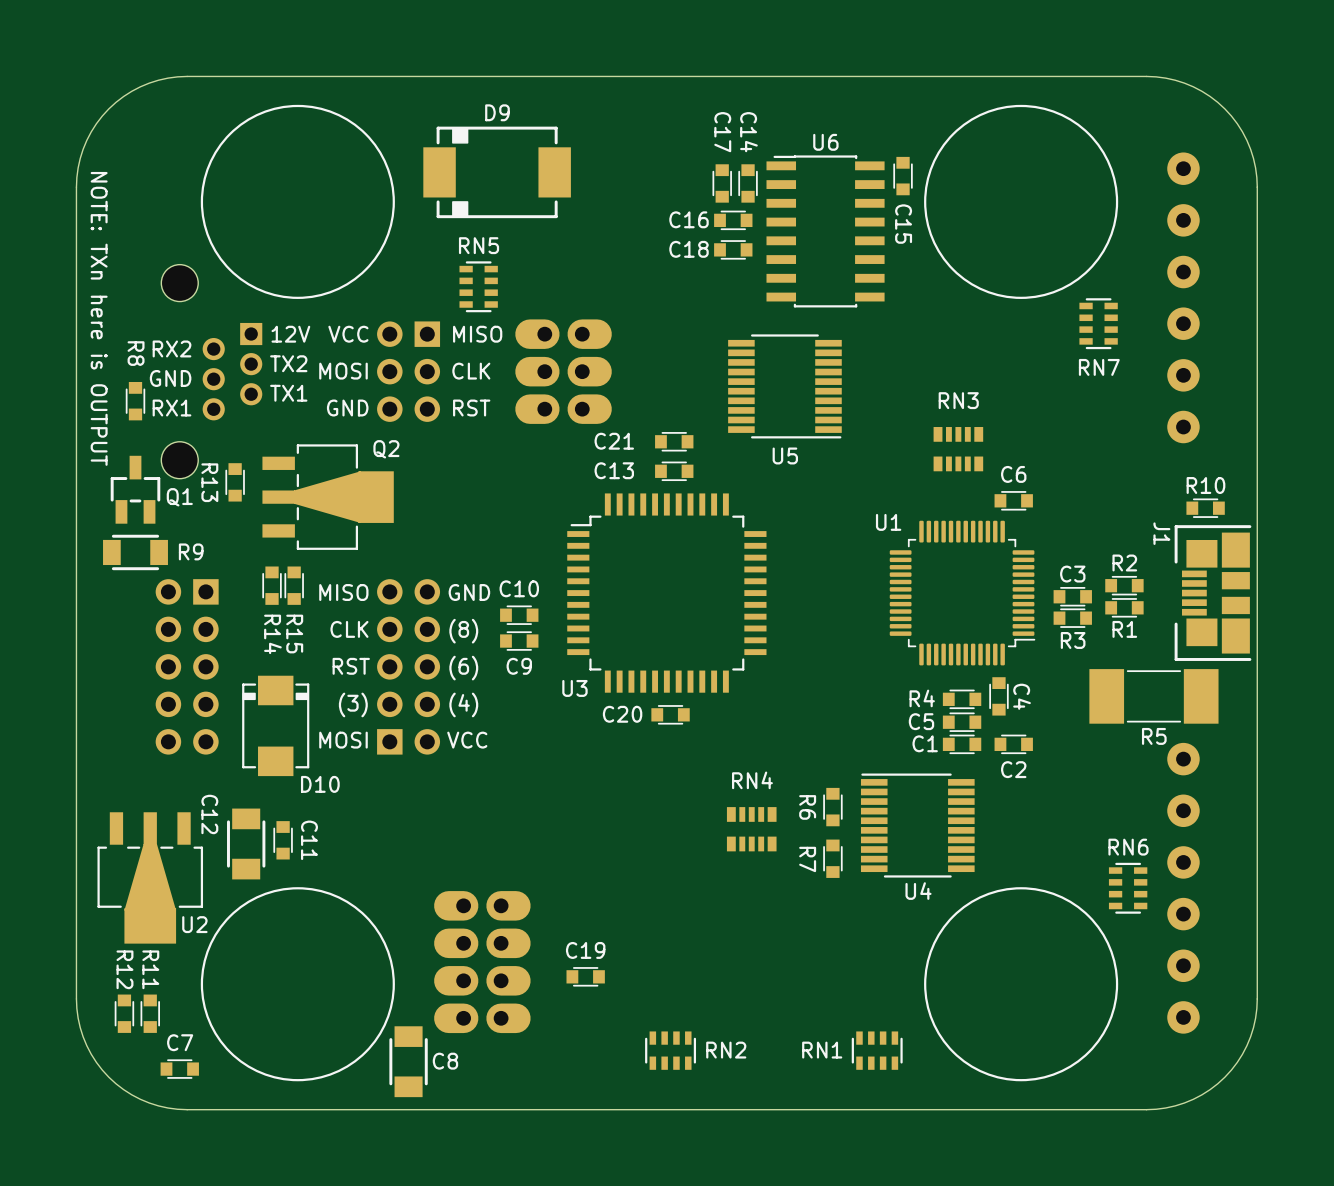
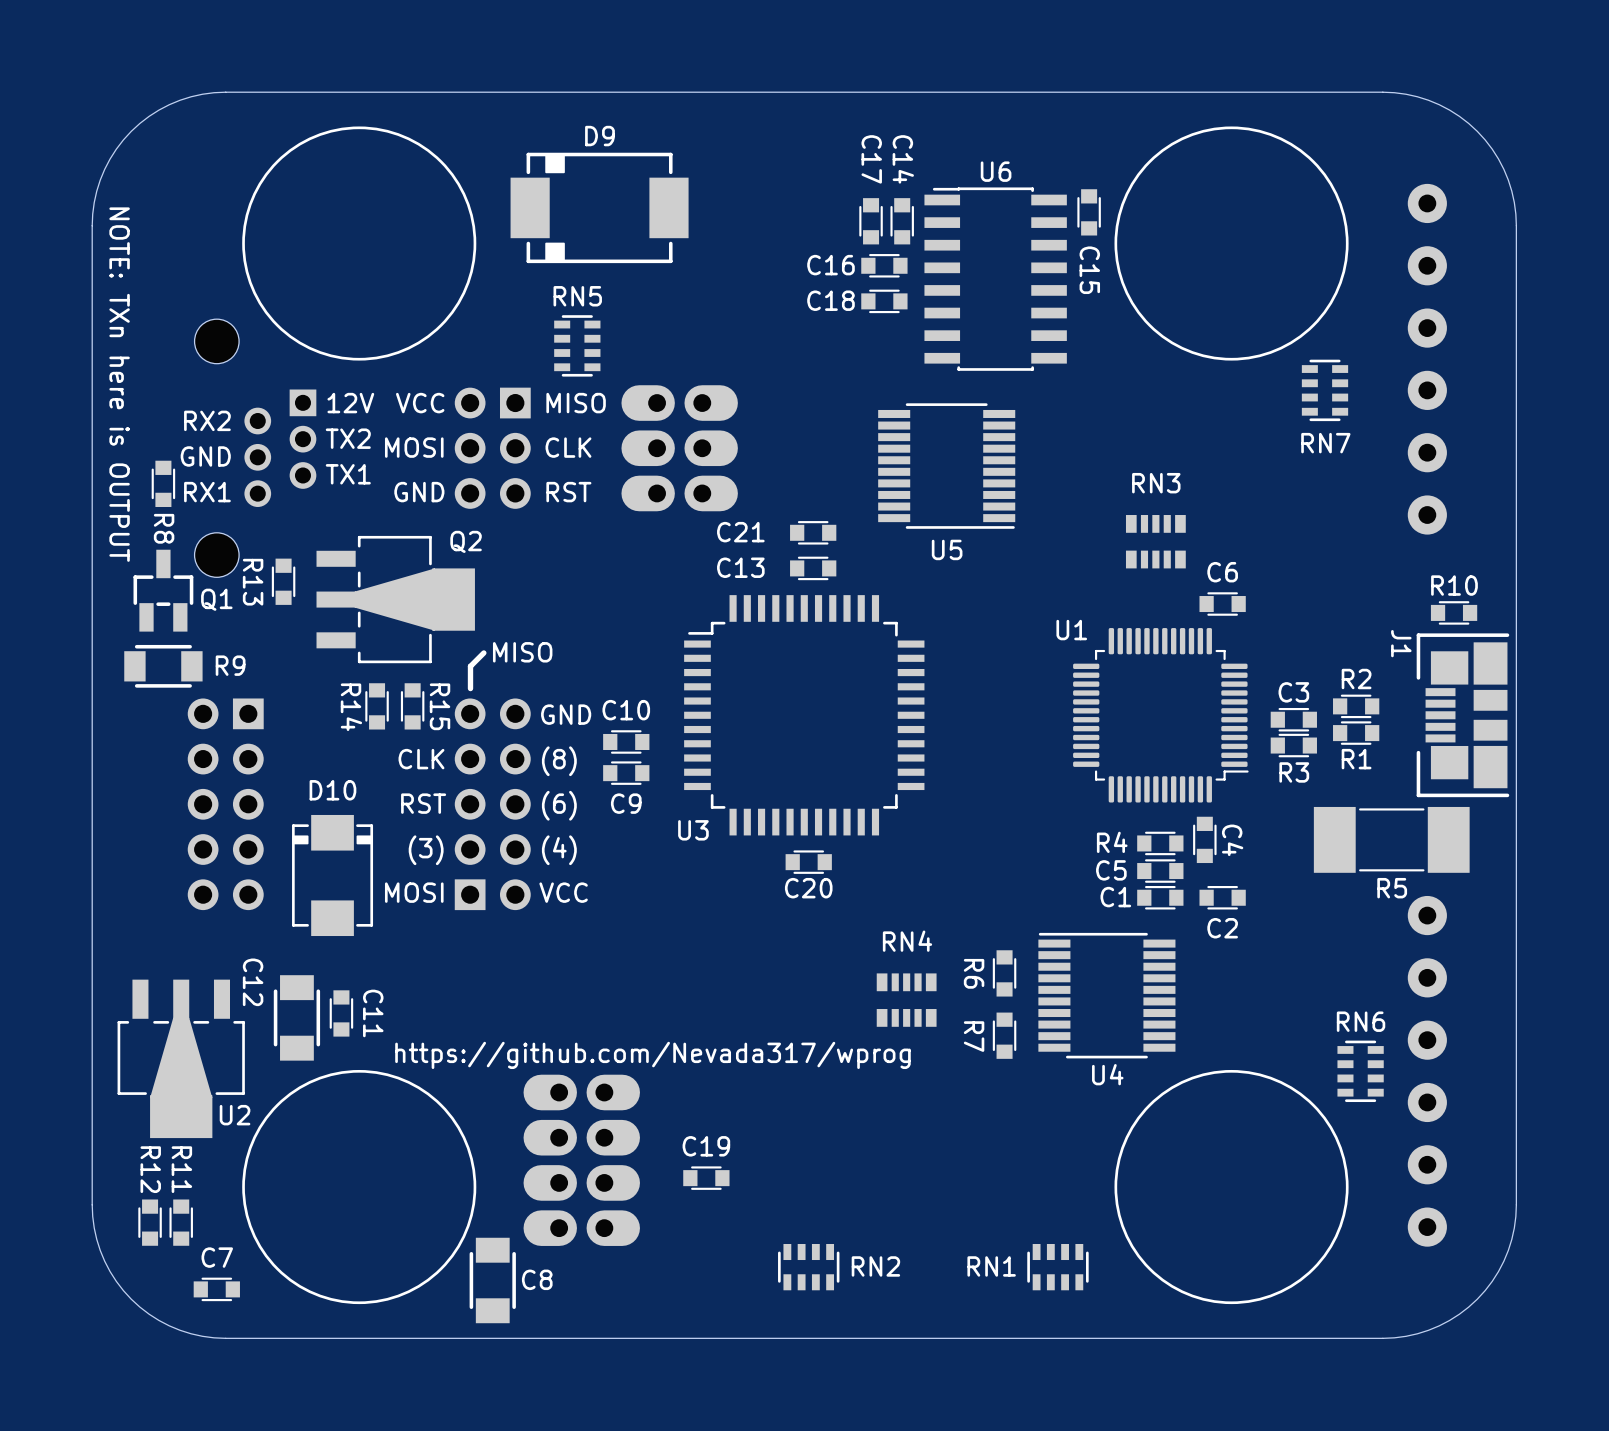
R8 name position: R8 (136, 353) -> R8 (164, 528)
line: none -> (483, 652) (470, 666) (470, 688)
R14 position: (272, 585) -> (377, 706)
R15 position: (294, 585) -> (412, 706)
text position: MISO (343, 592) -> MISO (522, 652)
R14 name position: R14 (272, 634) -> R14 (351, 707)
R15 name position: R15 (294, 634) -> R15 (440, 706)
C20 name position: C20 (622, 714) -> C20 (808, 888)
D10 name position: D10 (320, 784) -> D10 (332, 790)
text: none -> https://github.com/Nevada317/wprog (652, 1055)

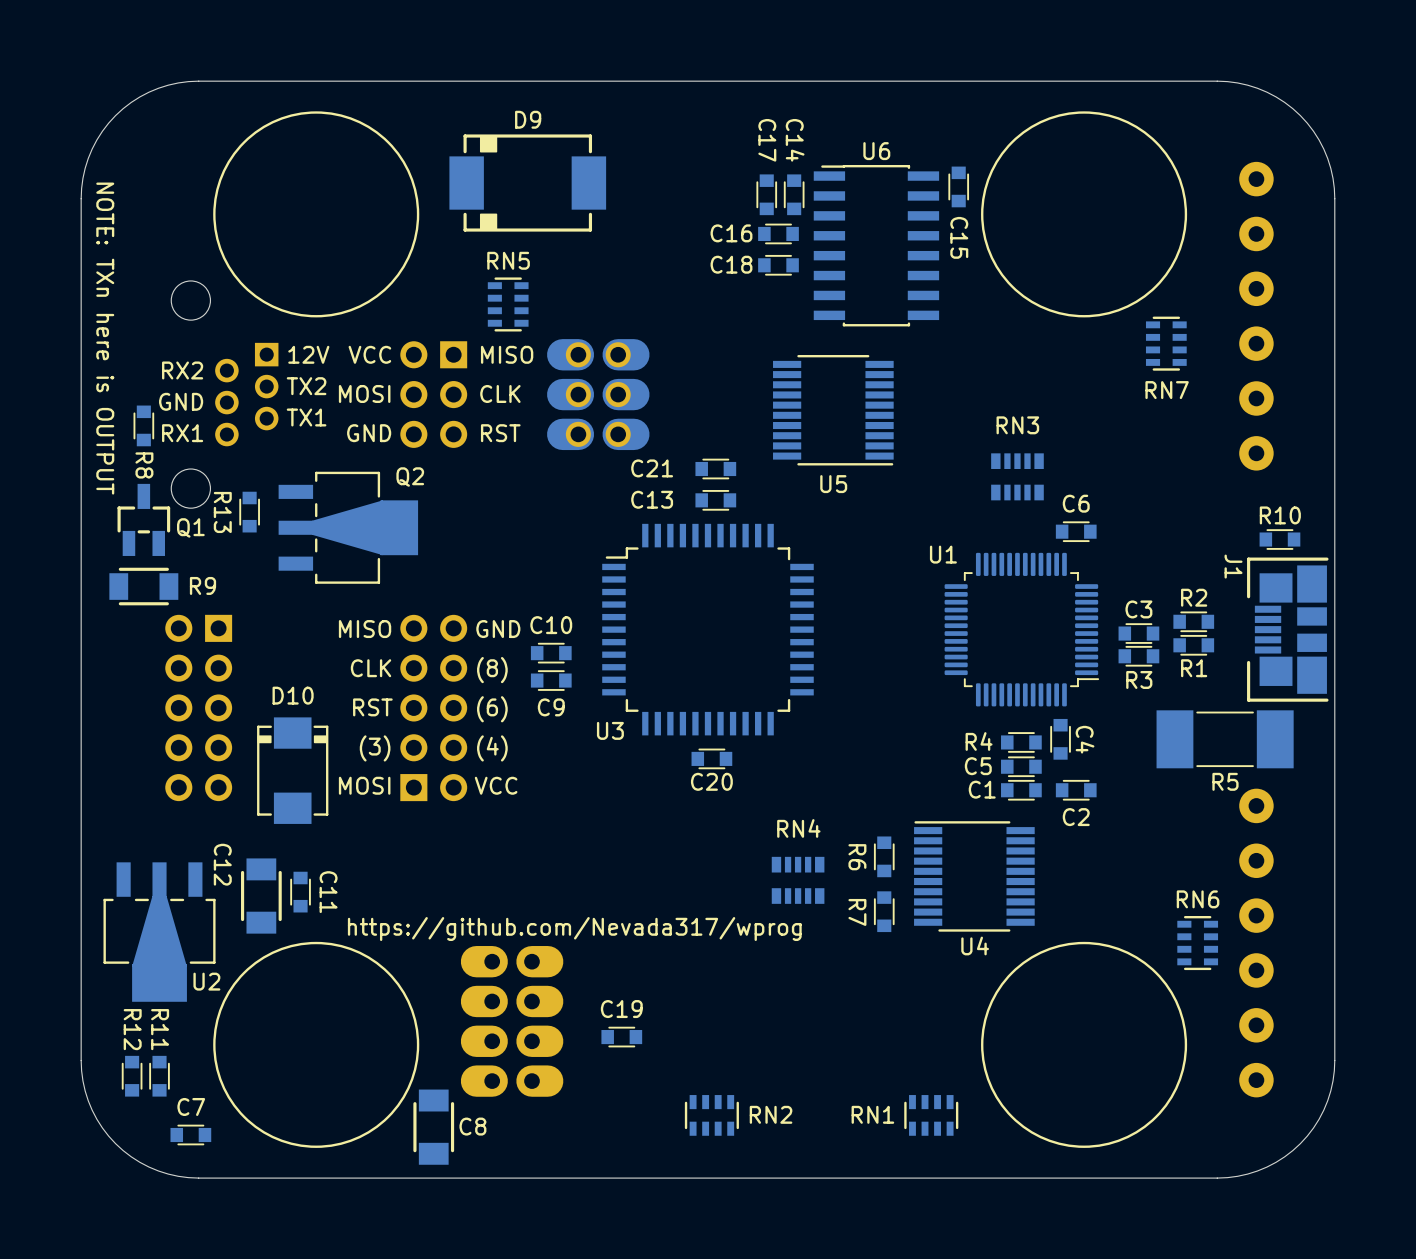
line: (483, 652) (470, 666) (470, 688) -> none
text position: MISO (522, 652) -> MISO (365, 629)
R14: (377, 706) -> none
R15: (412, 706) -> none

